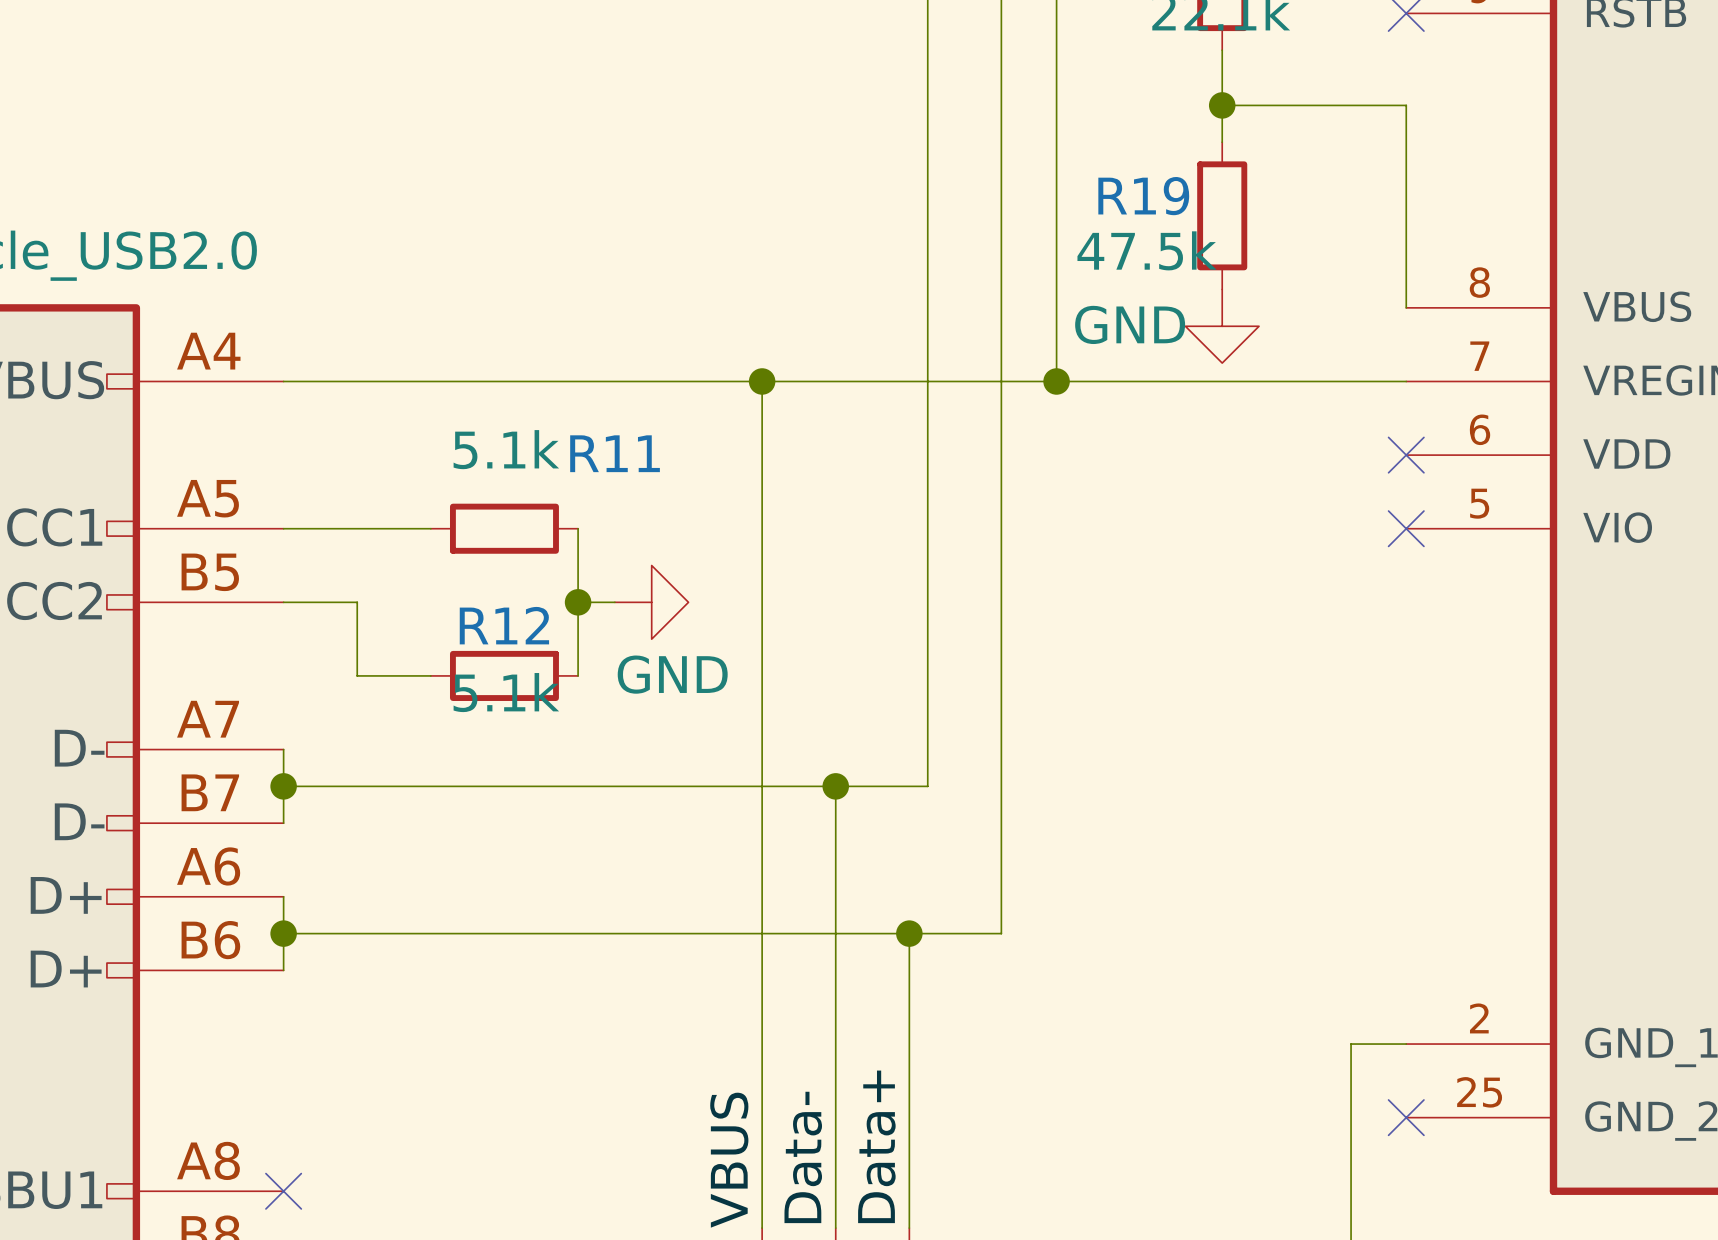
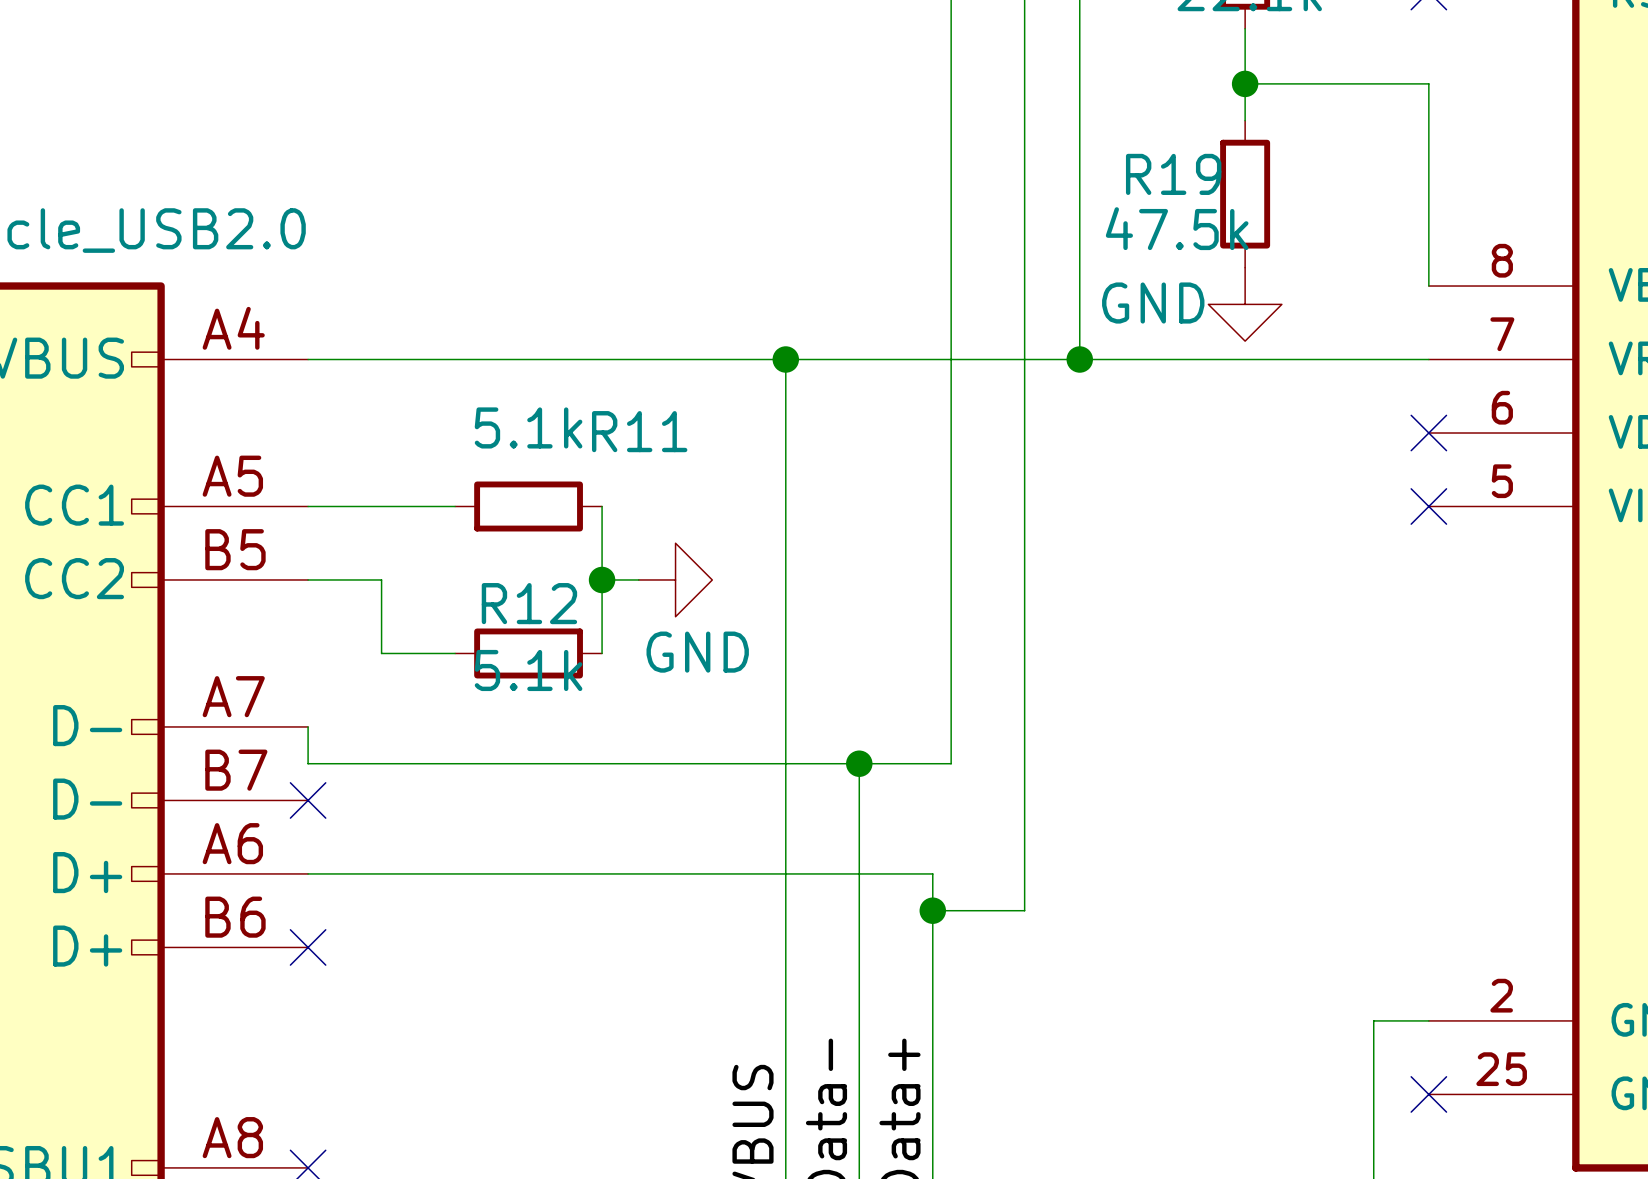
wire: (283, 786) (283, 823) -> none
junction: (283, 786) -> none
no-connect mark: none -> (308, 800)
wire: (283, 896) (283, 970) -> none
wire: (283, 933) (909, 933) -> (308, 873) (932, 873) (932, 910)
junction: (283, 933) -> none
no-connect mark: none -> (308, 947)

